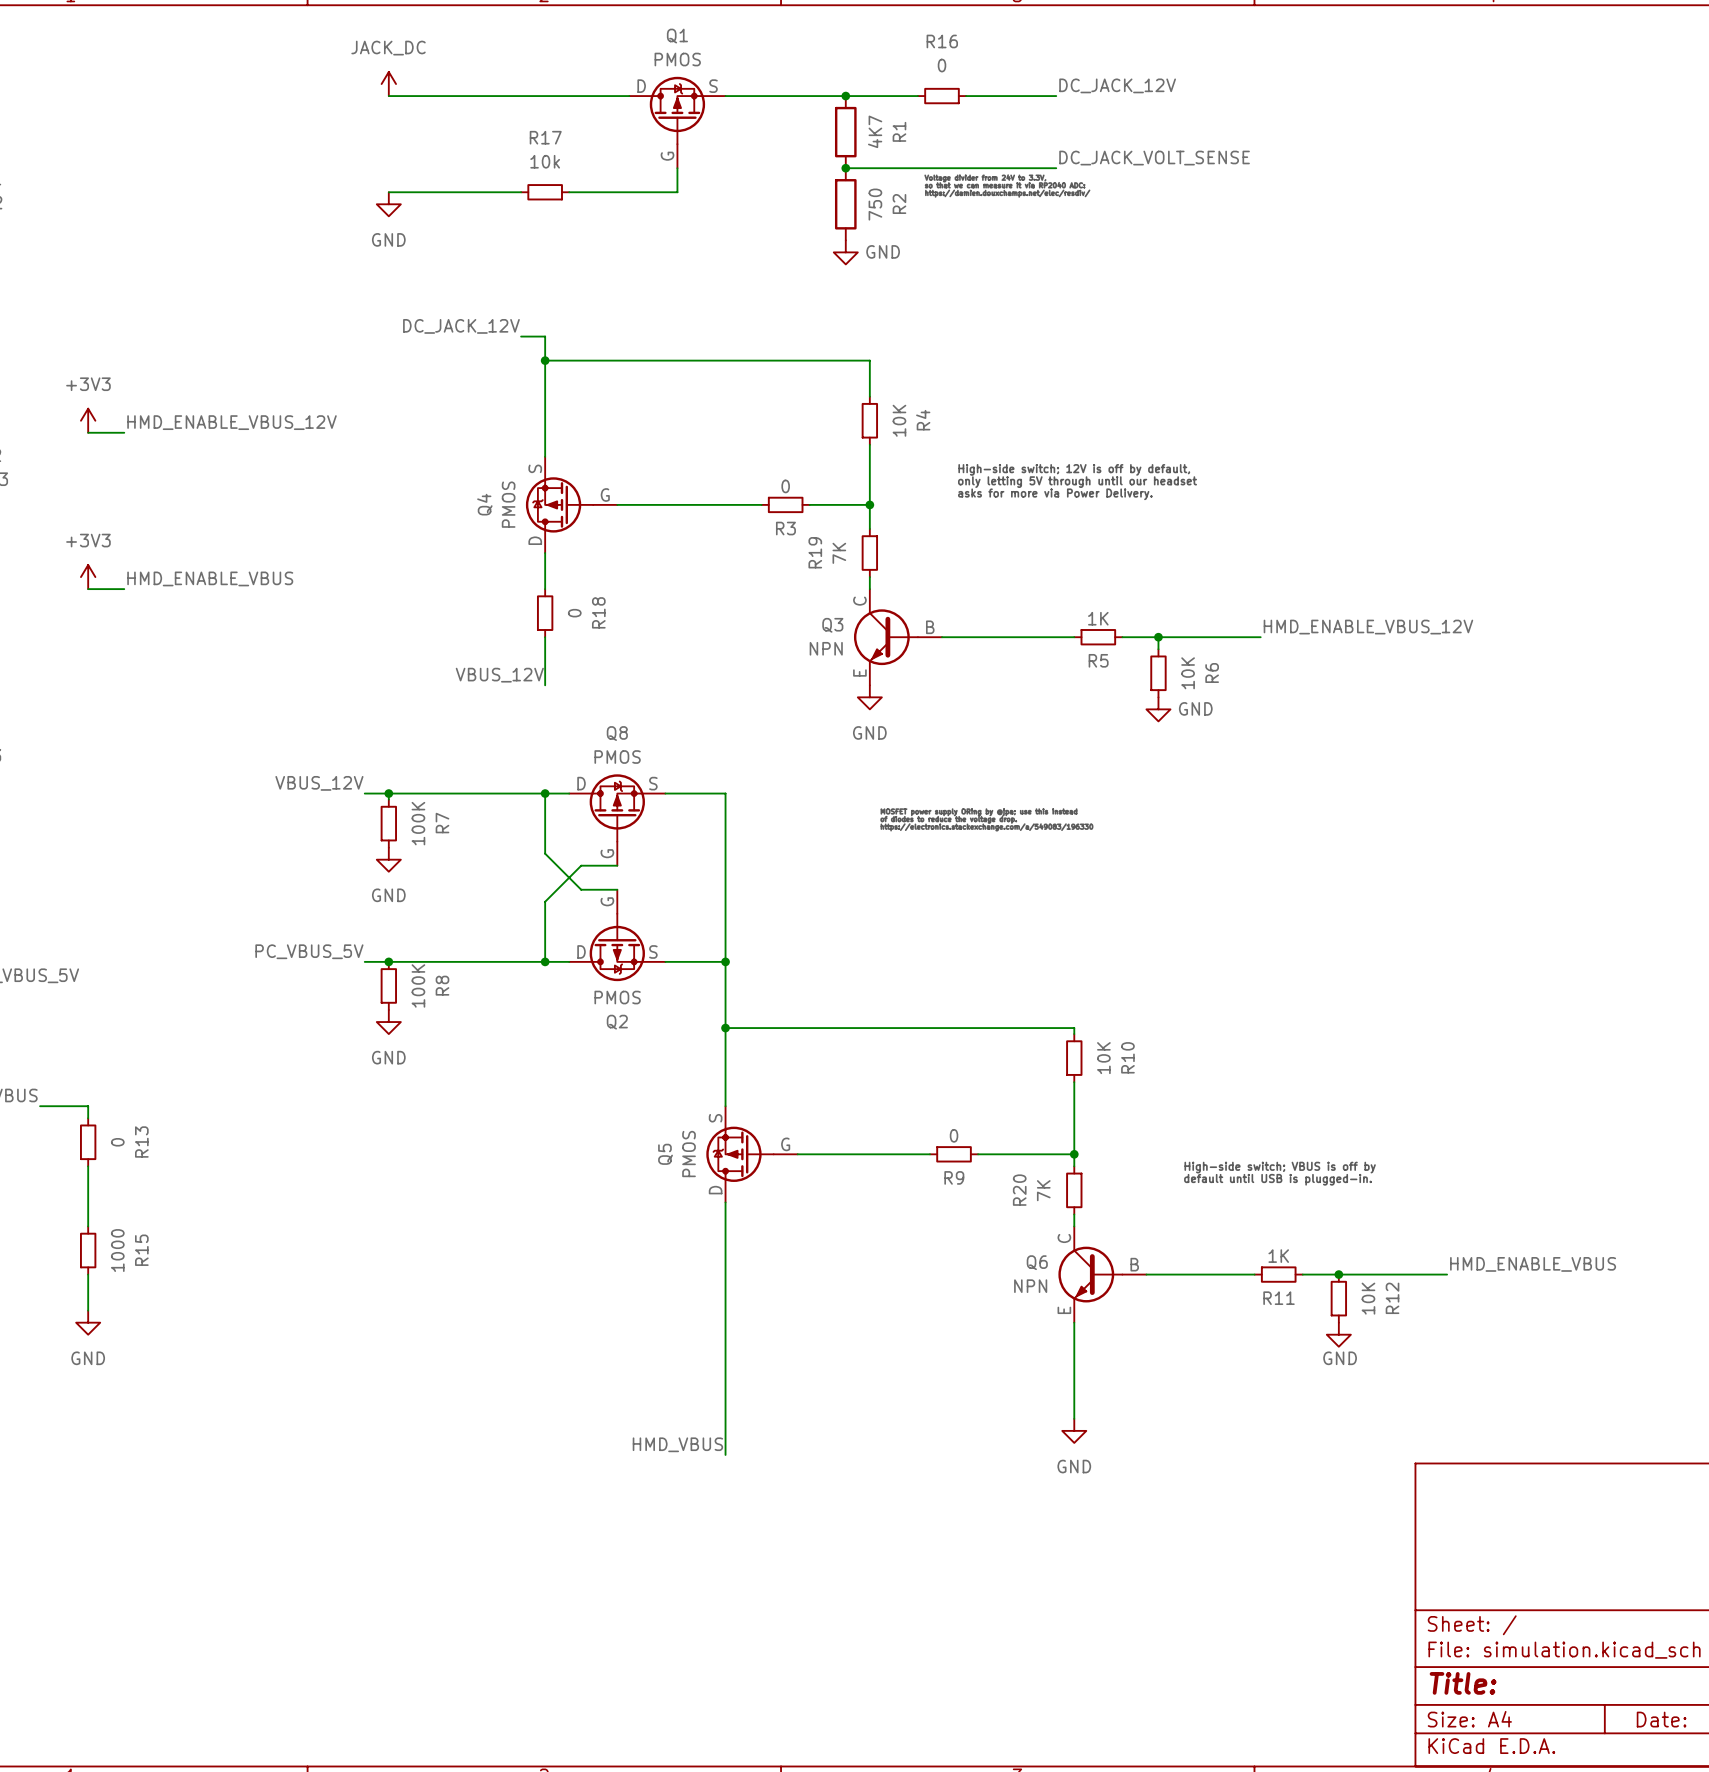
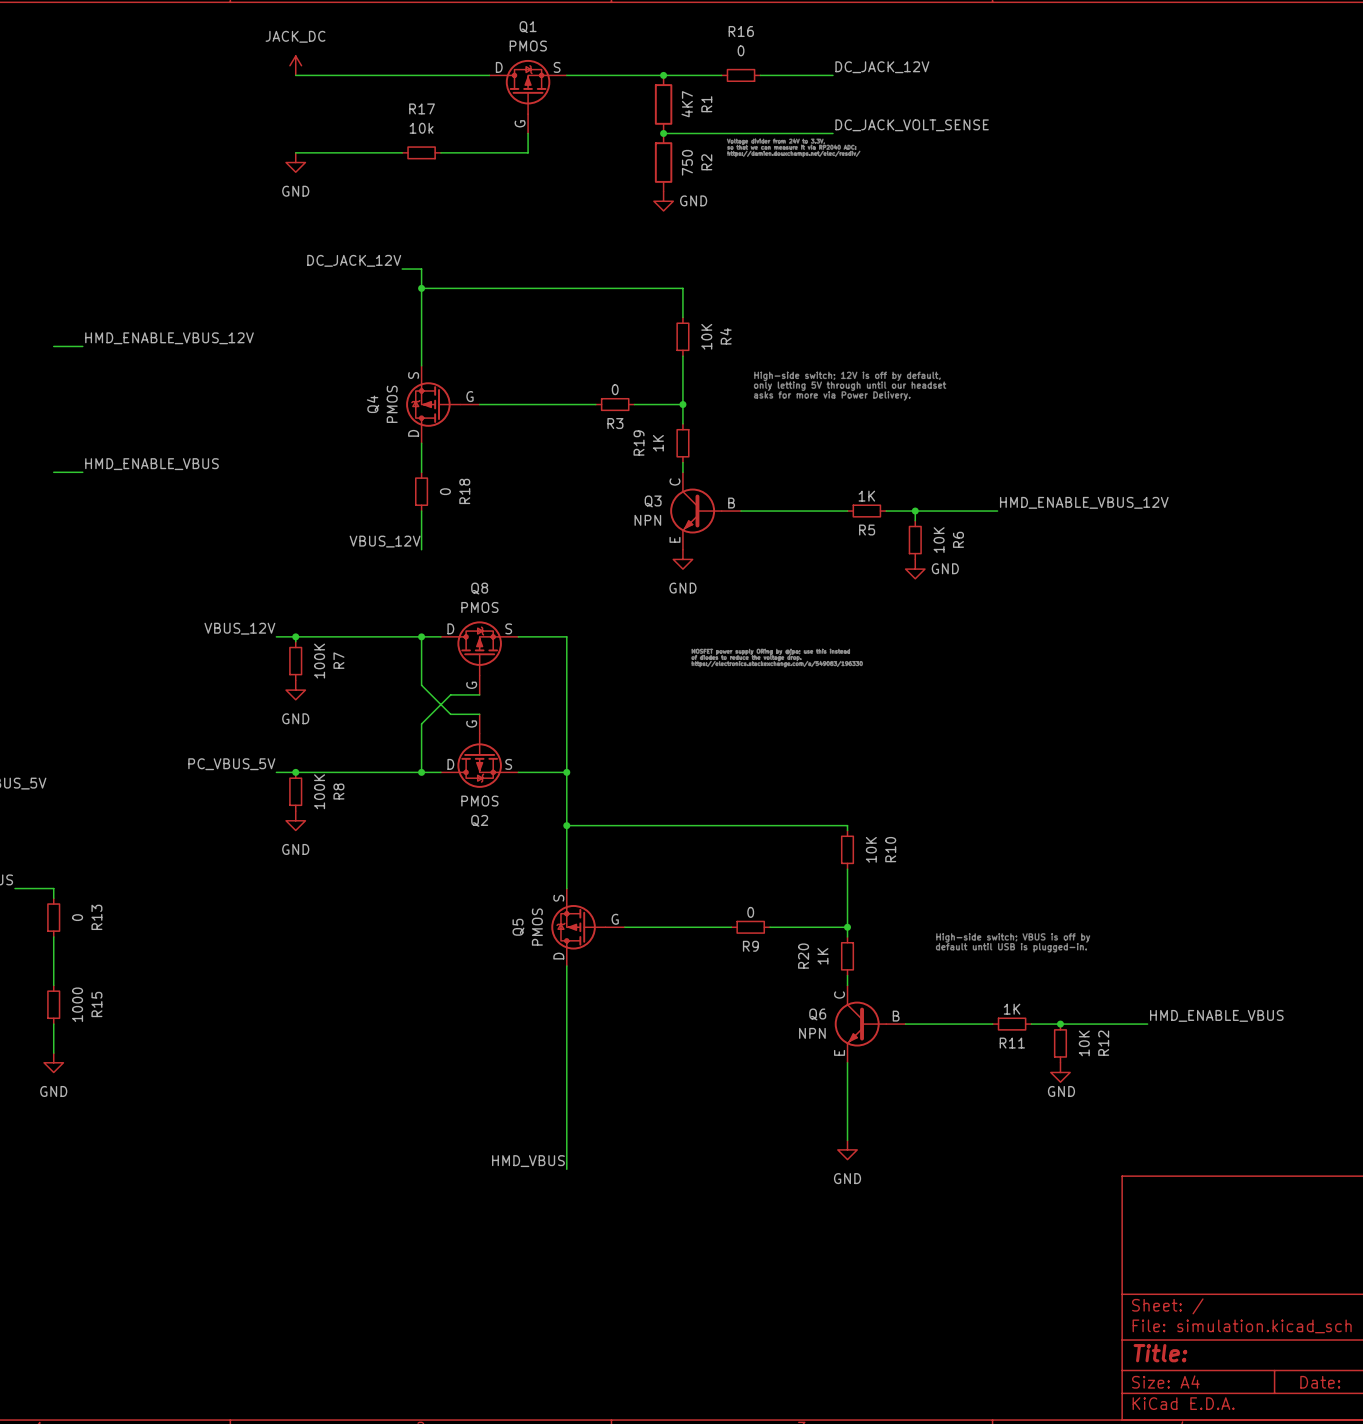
power symbol: +3V3 (88, 420) -> none
R19 value: 7K (839, 553) -> 1K (658, 443)
power symbol: +3V3 (88, 577) -> none
R20 value: 7K (1043, 1190) -> 1K (822, 956)

